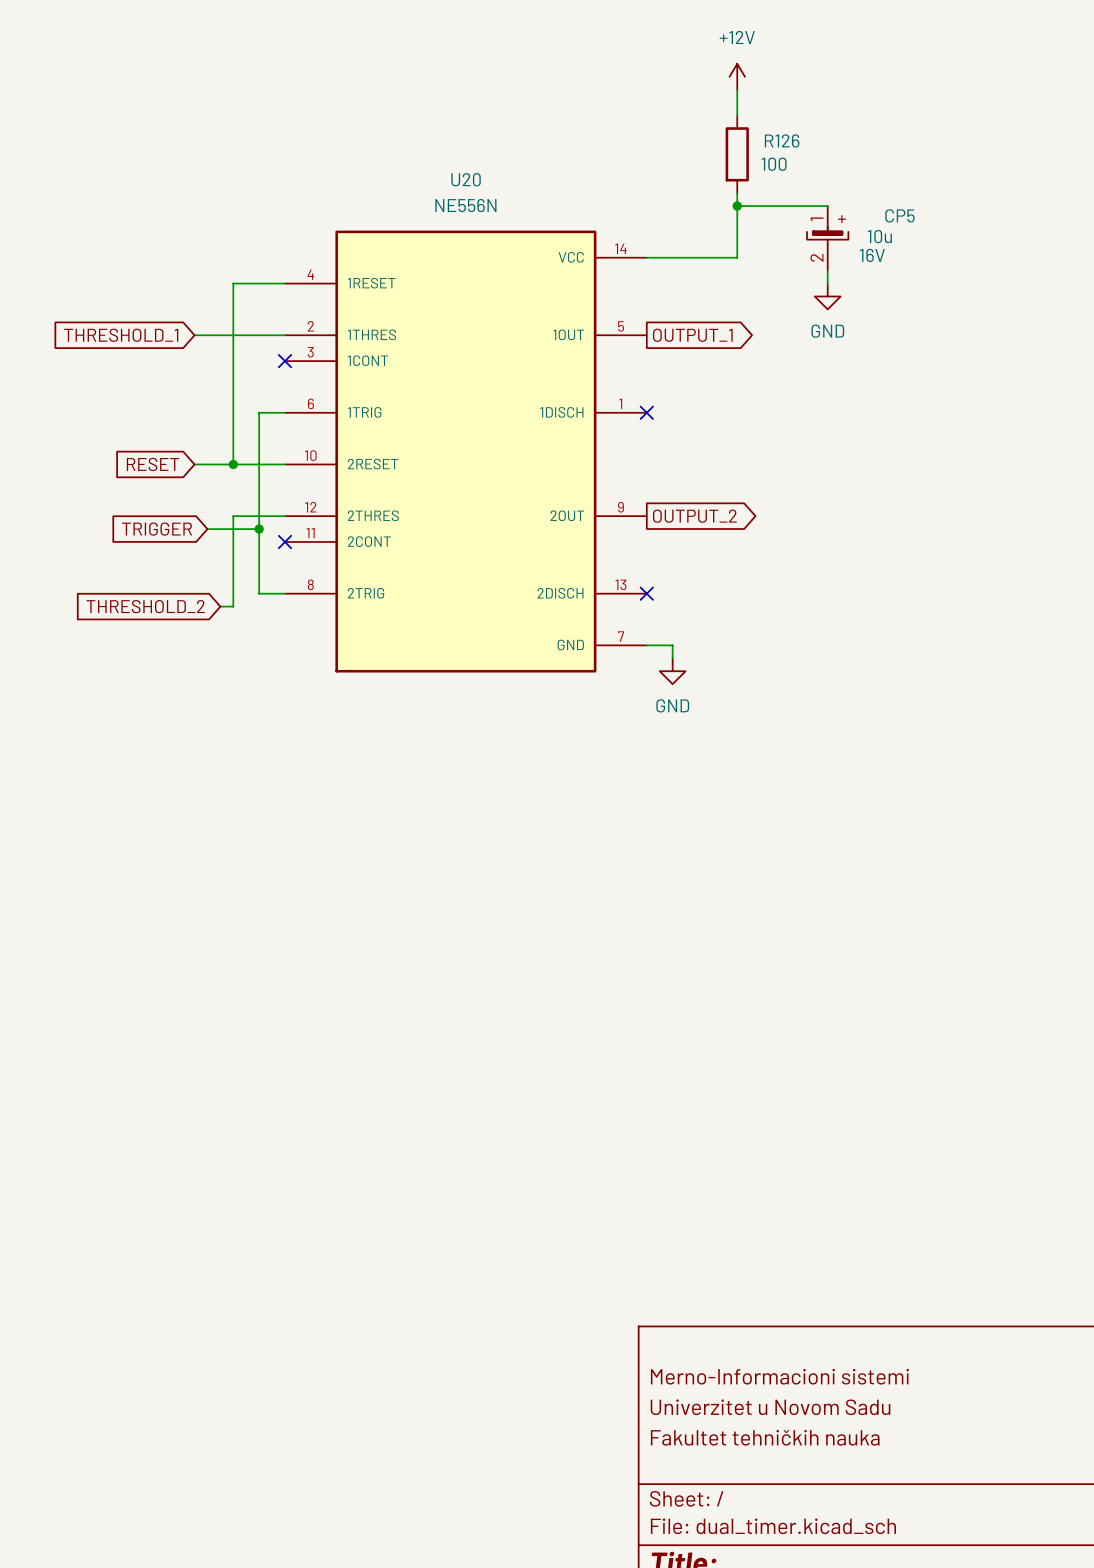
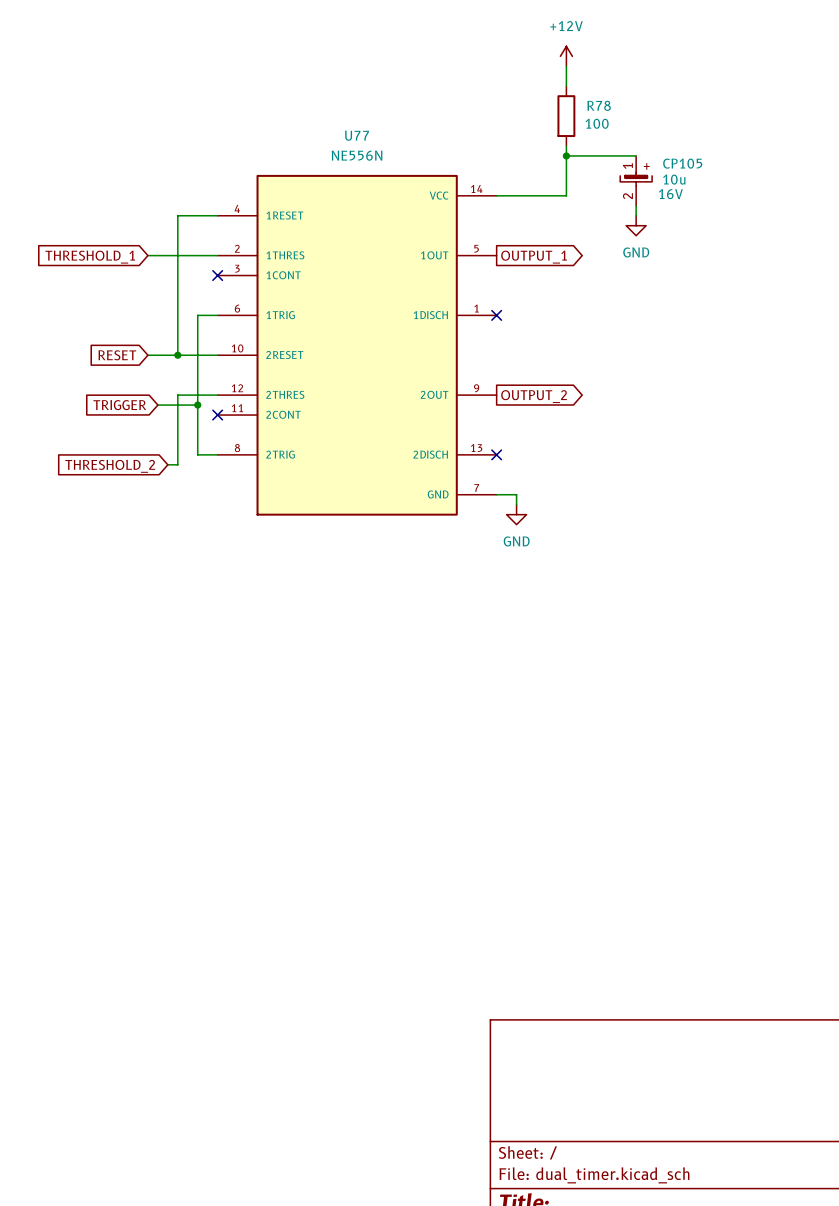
R126 name: R126 (782, 140) -> R78 (599, 105)
U20 name: U20 (466, 179) -> U77 (356, 135)
CP5 name: CP5 (899, 215) -> CP105 (682, 163)
title block: Merno-Informacioni sistemi (779, 1376) -> none
title block: Univerzitet u Novom Sadu (770, 1407) -> none
title block: Fakultet tehničkih nauka (765, 1437) -> none

